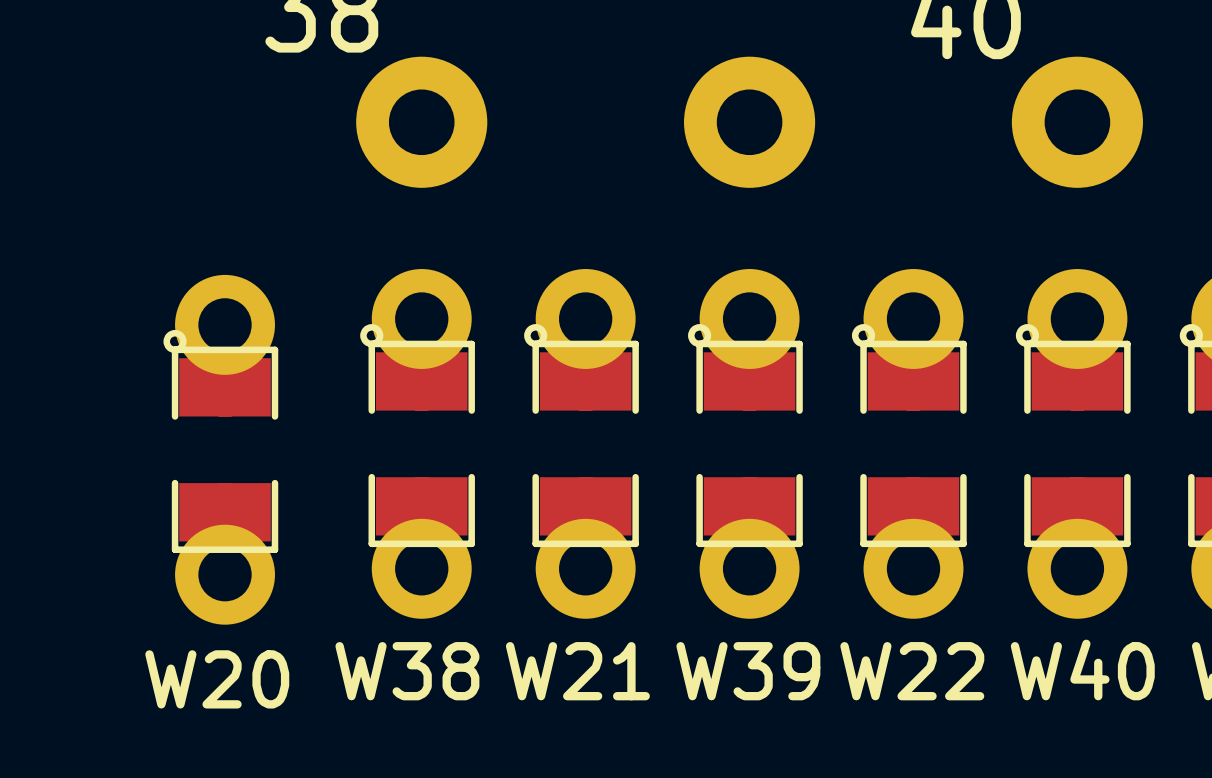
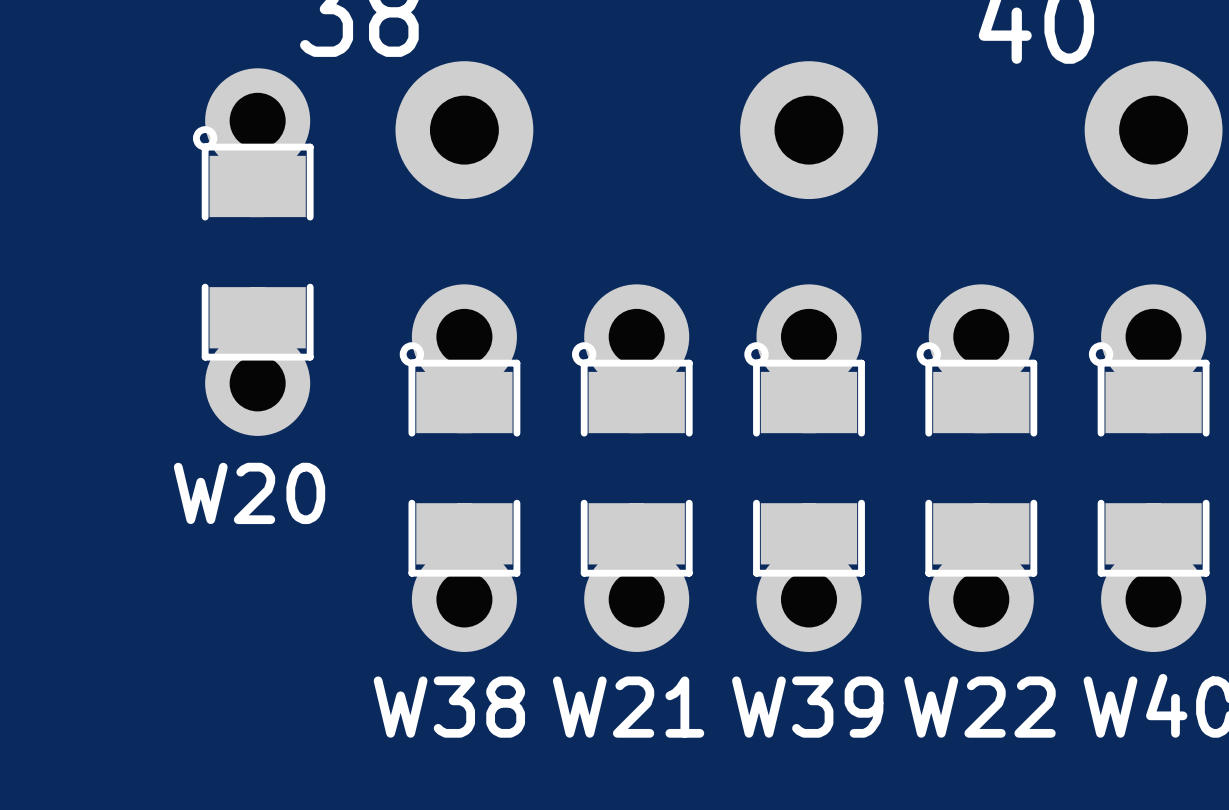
W20 position: (220, 449) -> (253, 252)

